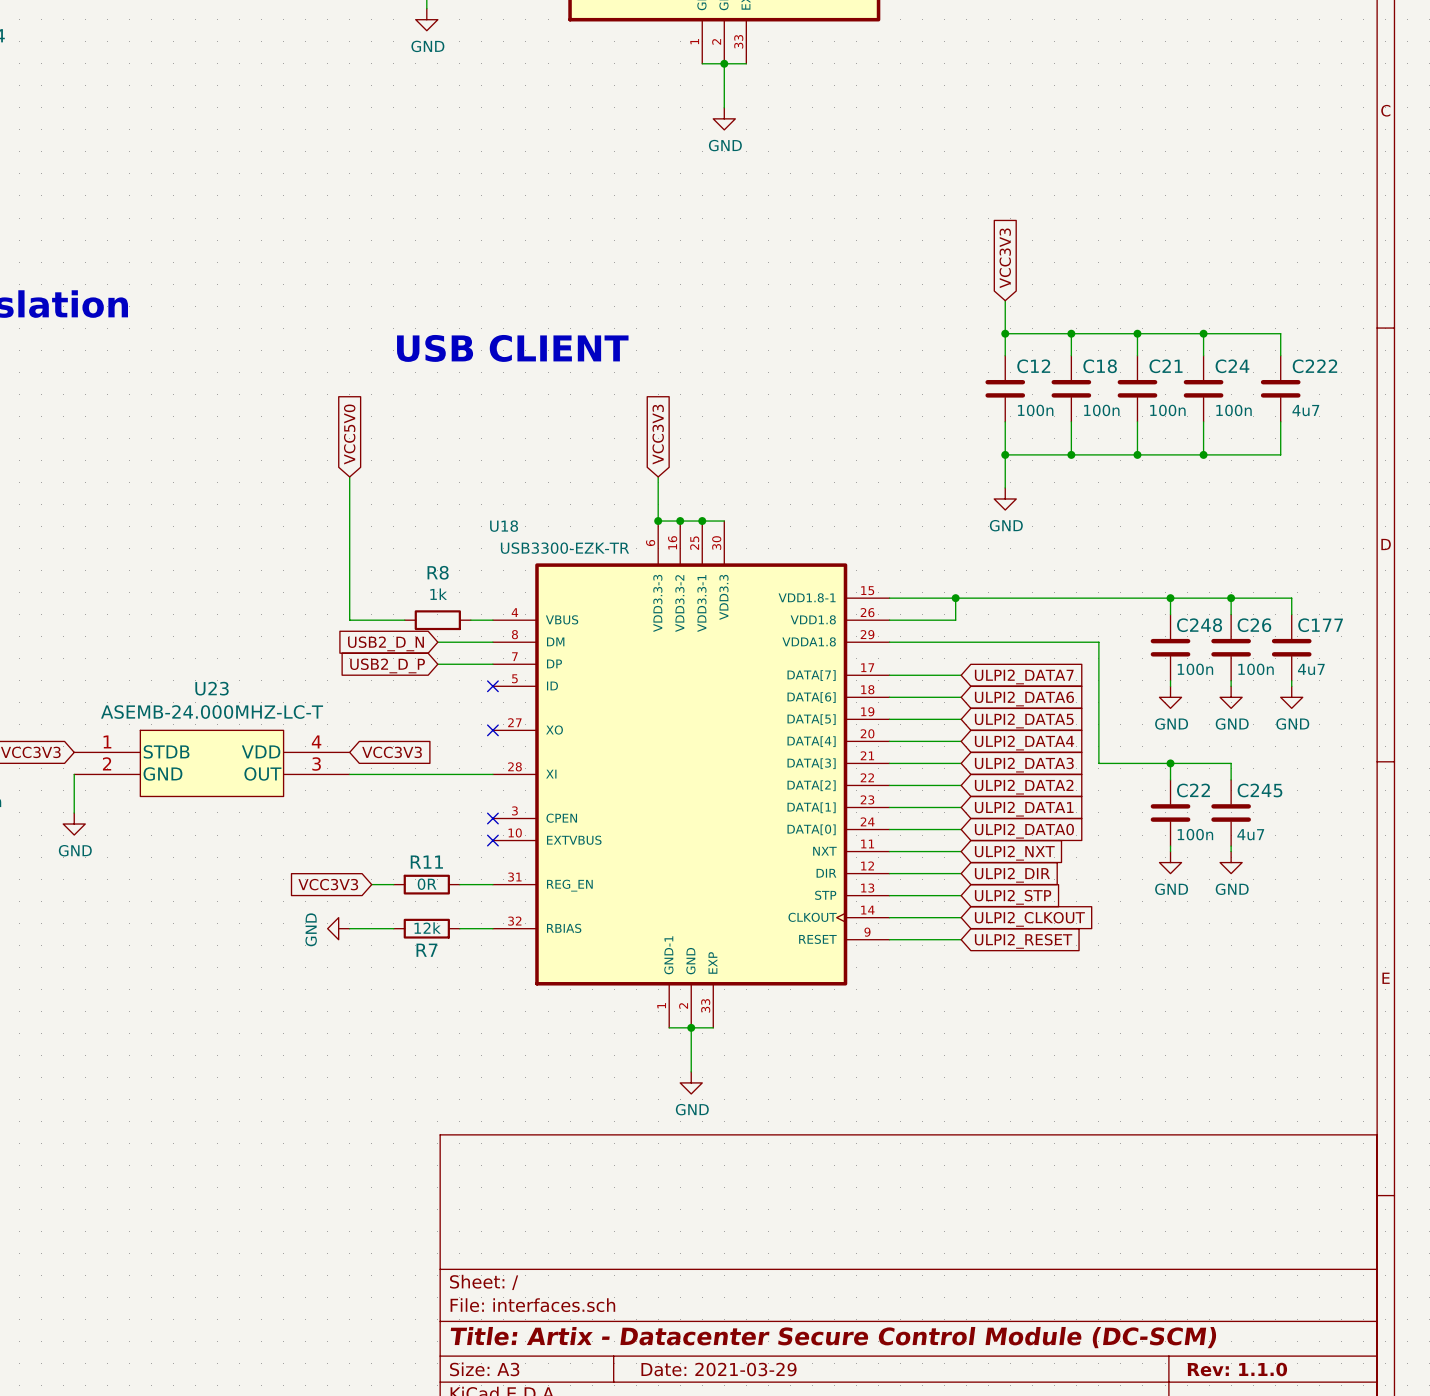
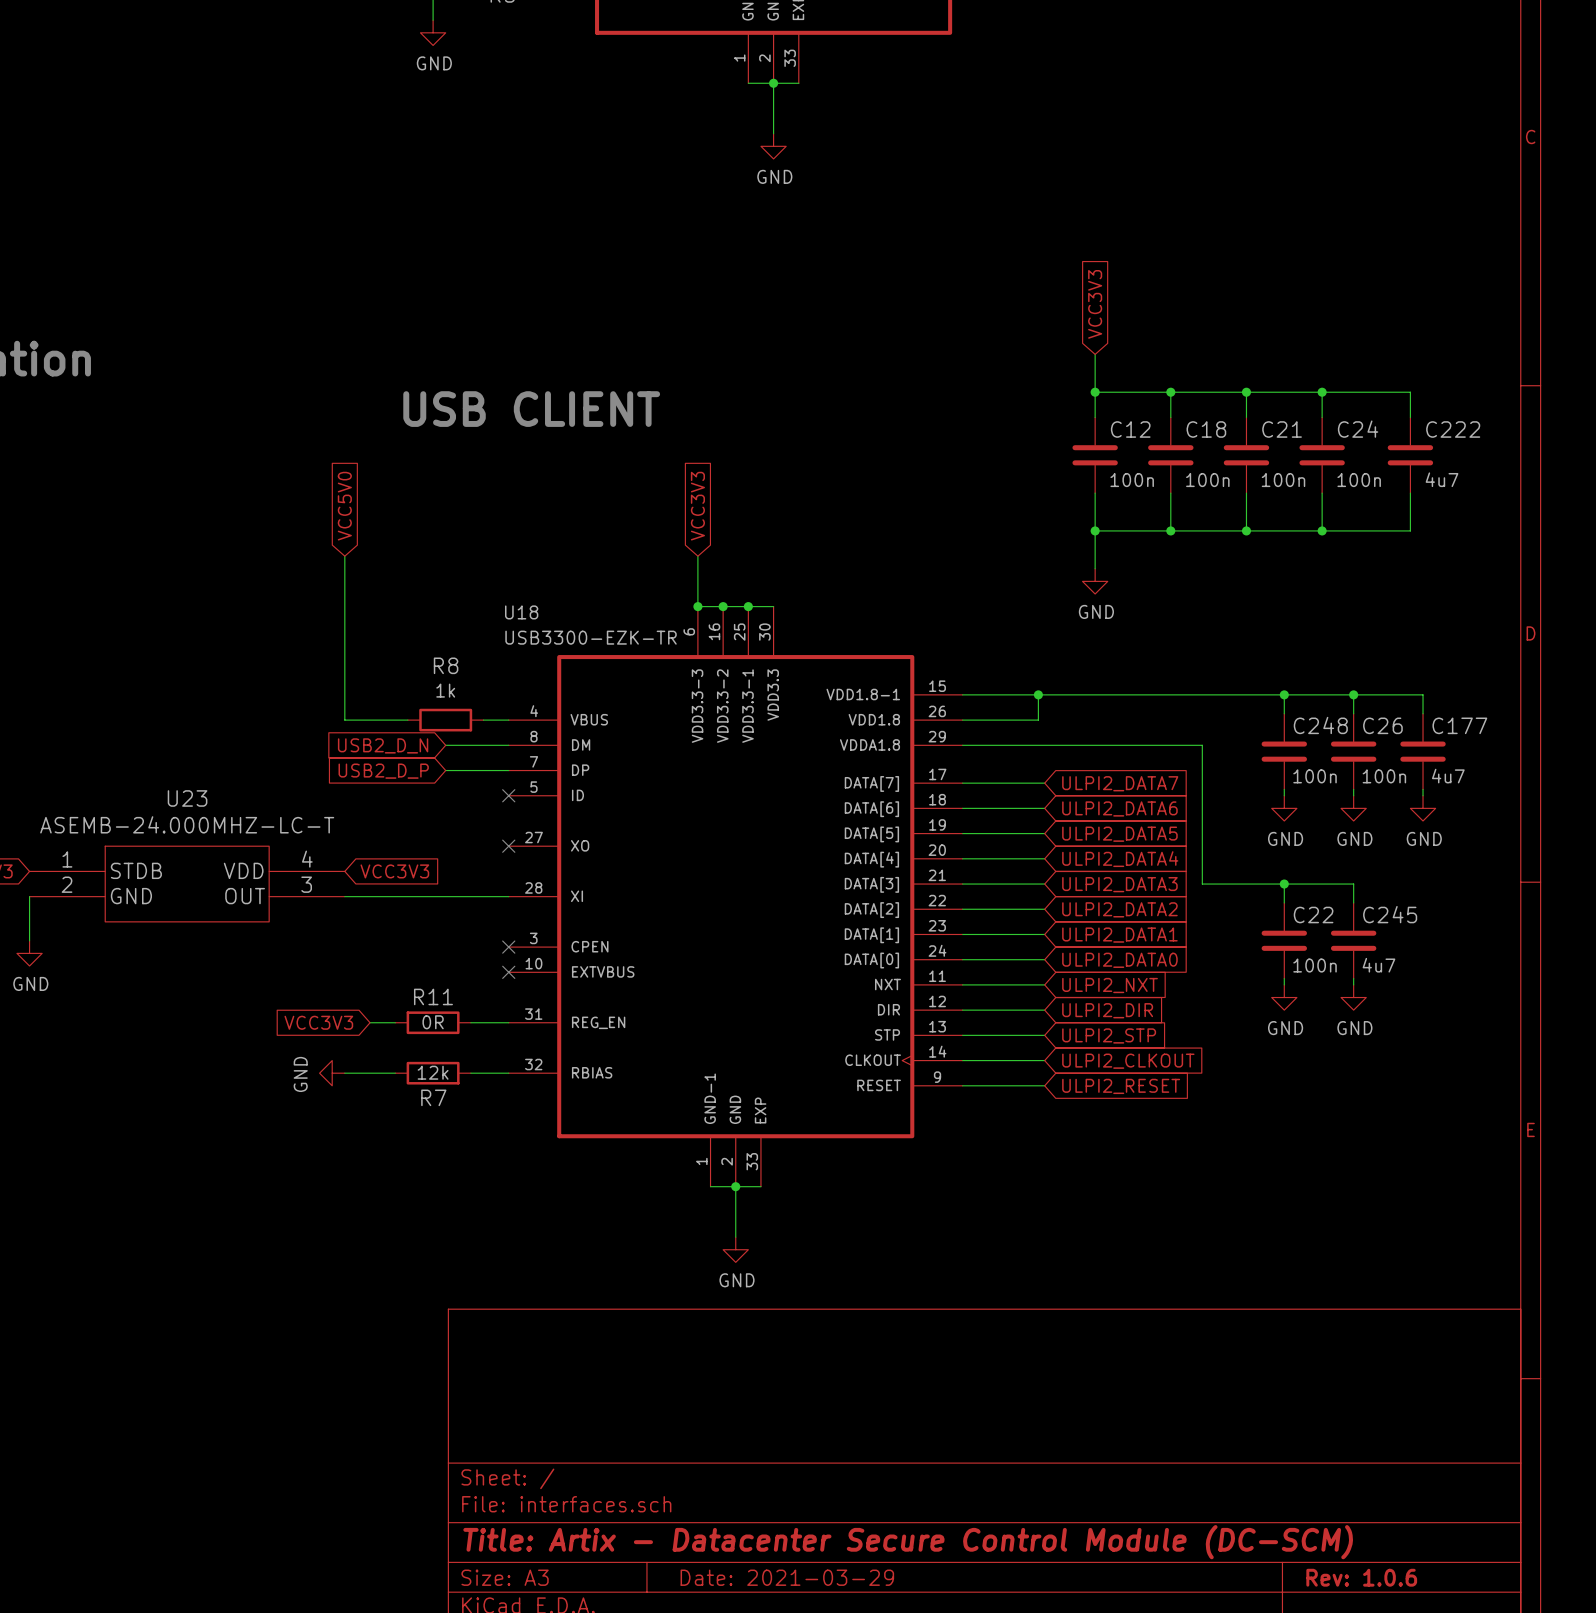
title block: Rev: 1.1.0 (1237, 1369) -> Rev: 1.0.6 (1361, 1577)

